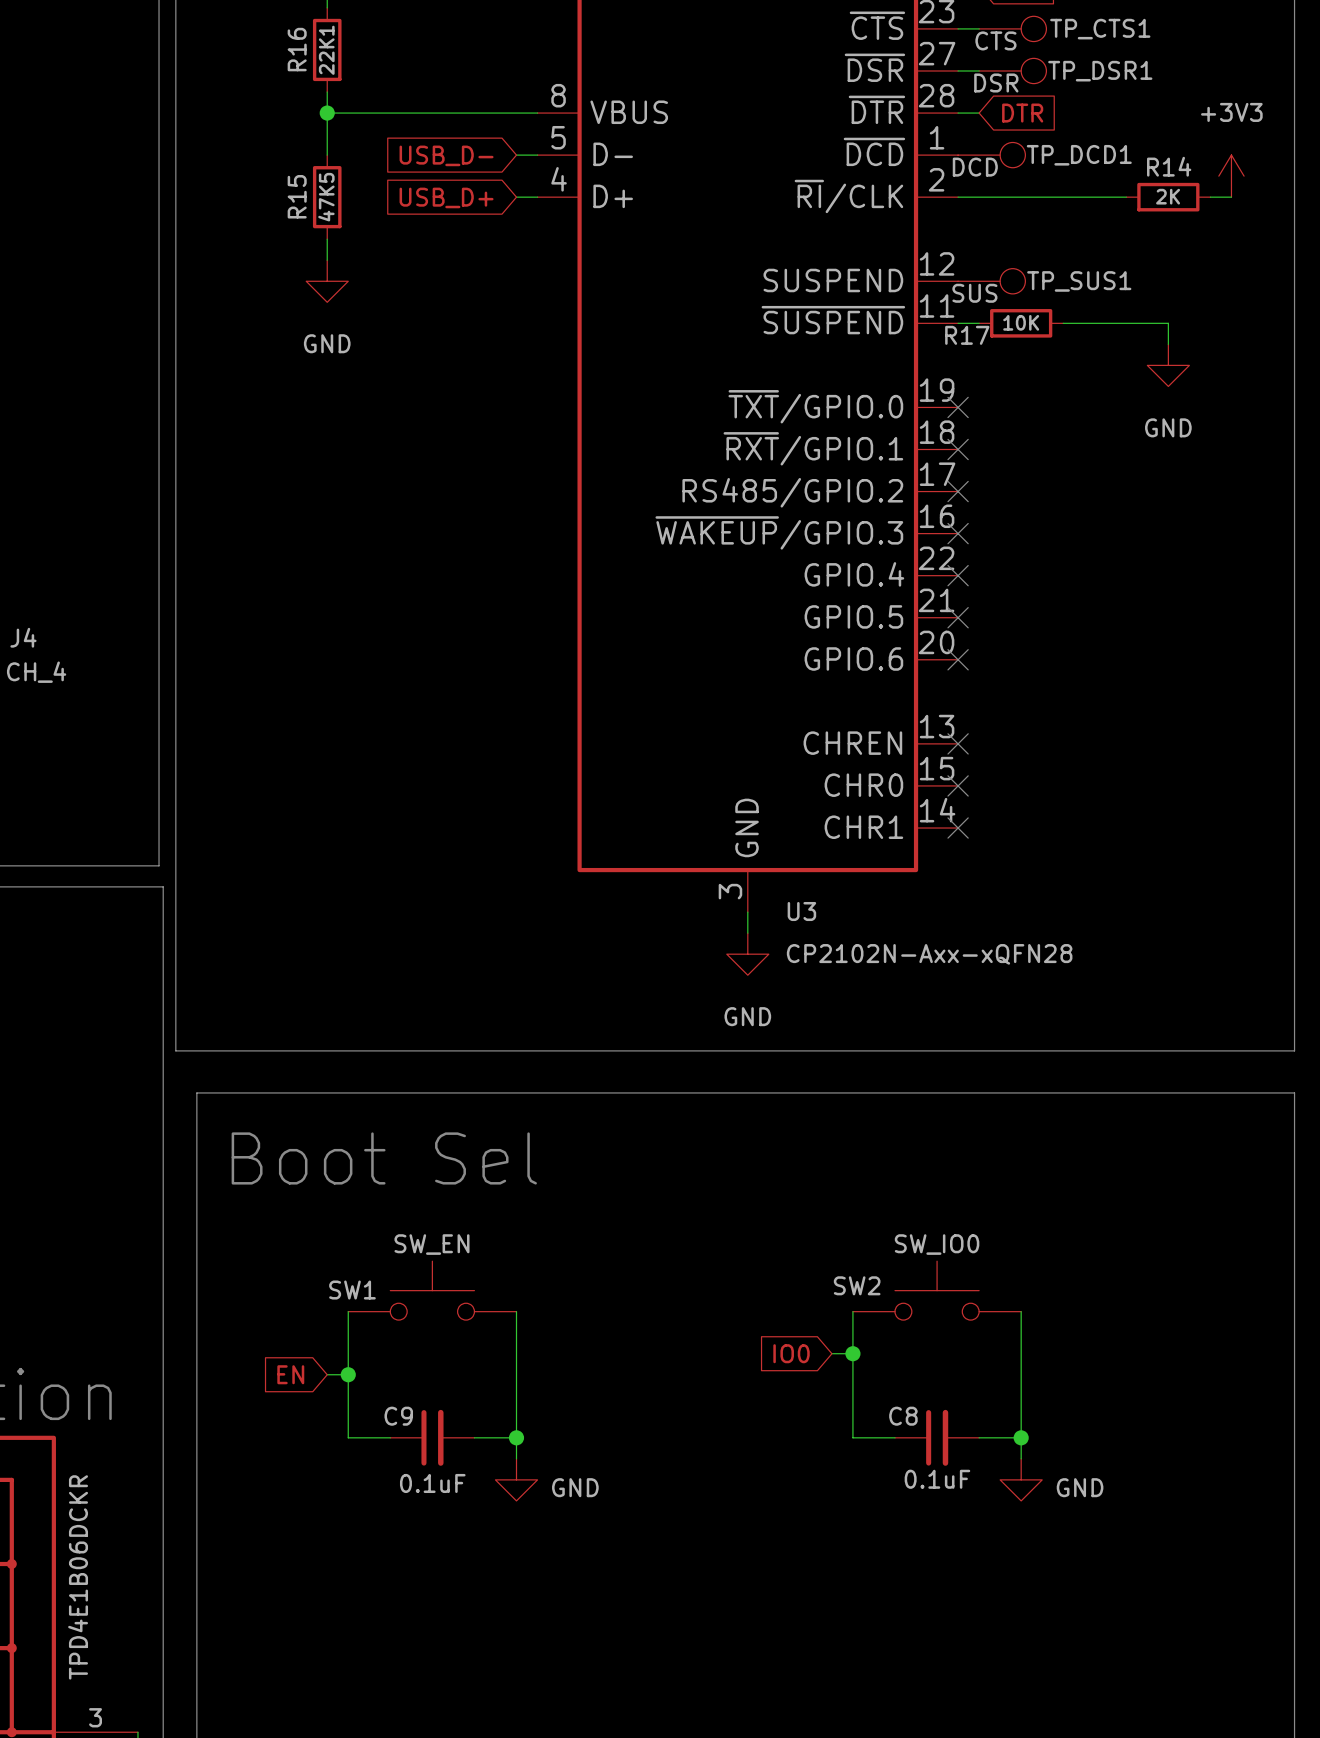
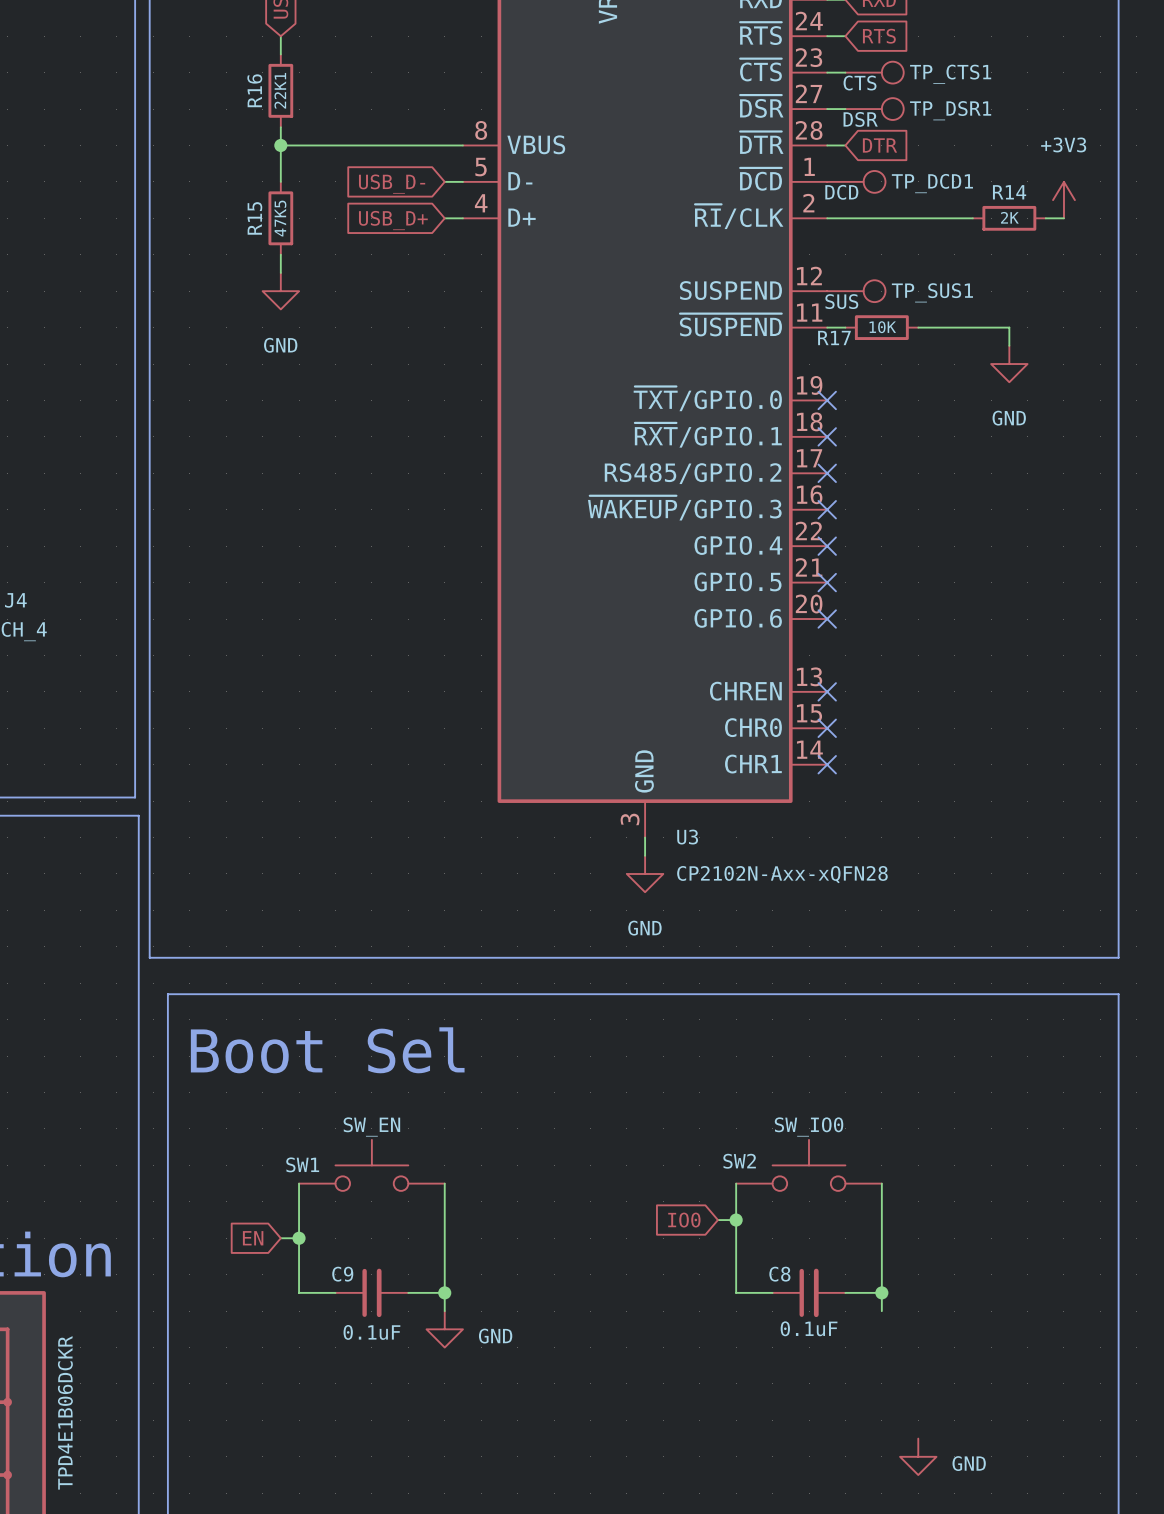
power symbol position: GND (1021, 1479) -> GND (918, 1456)

